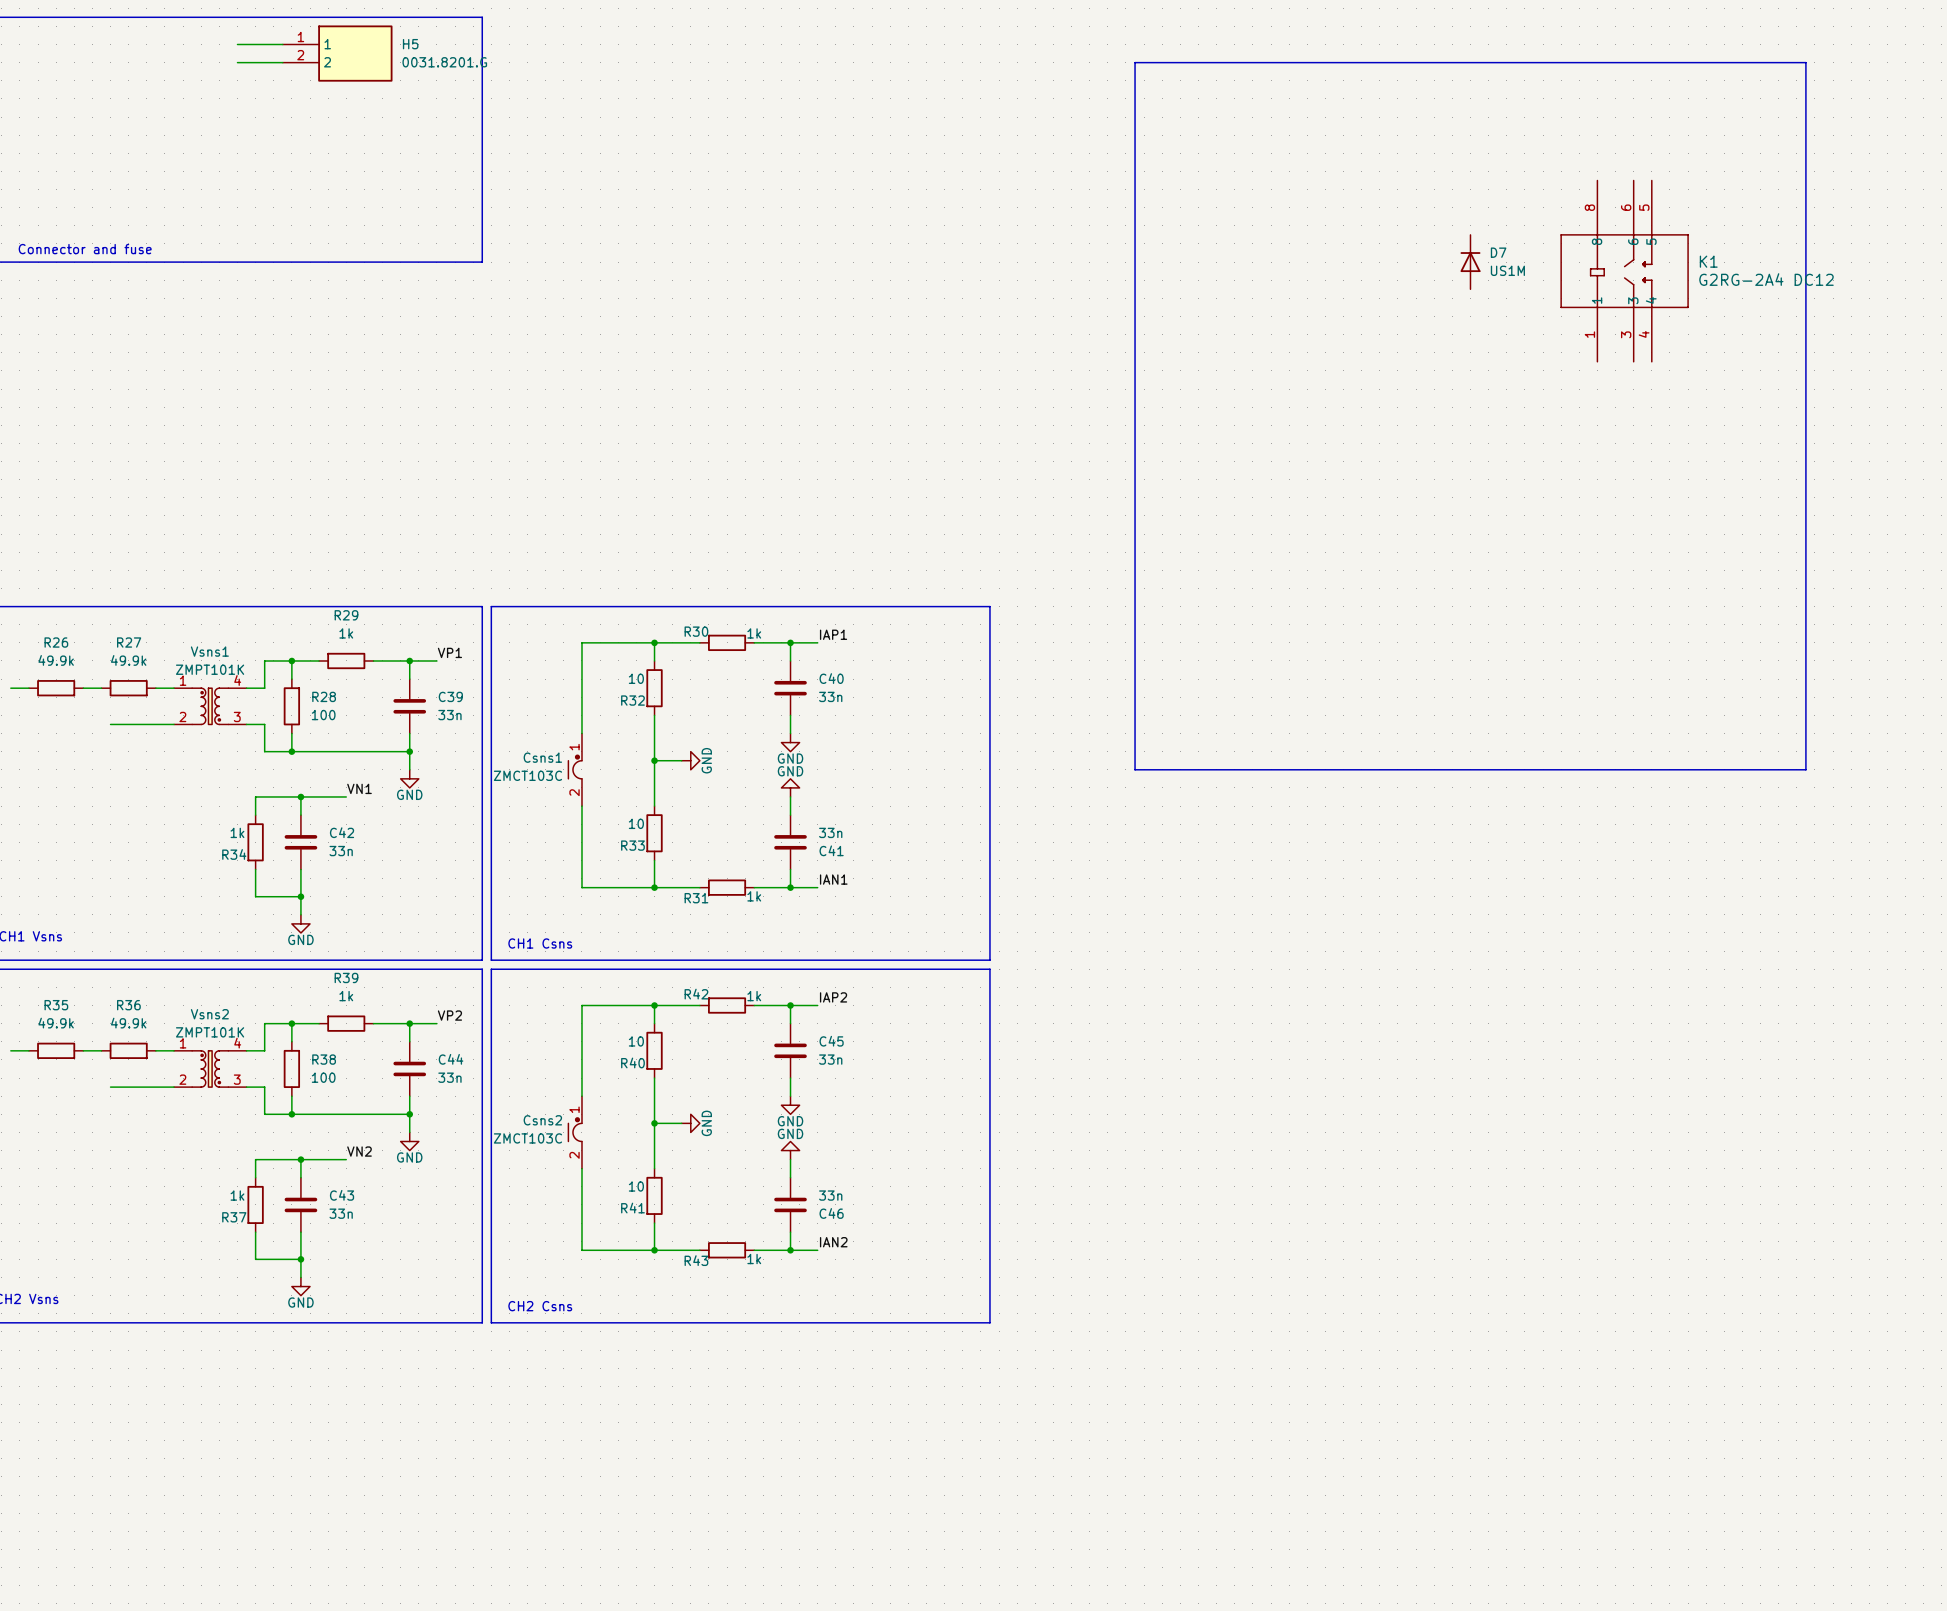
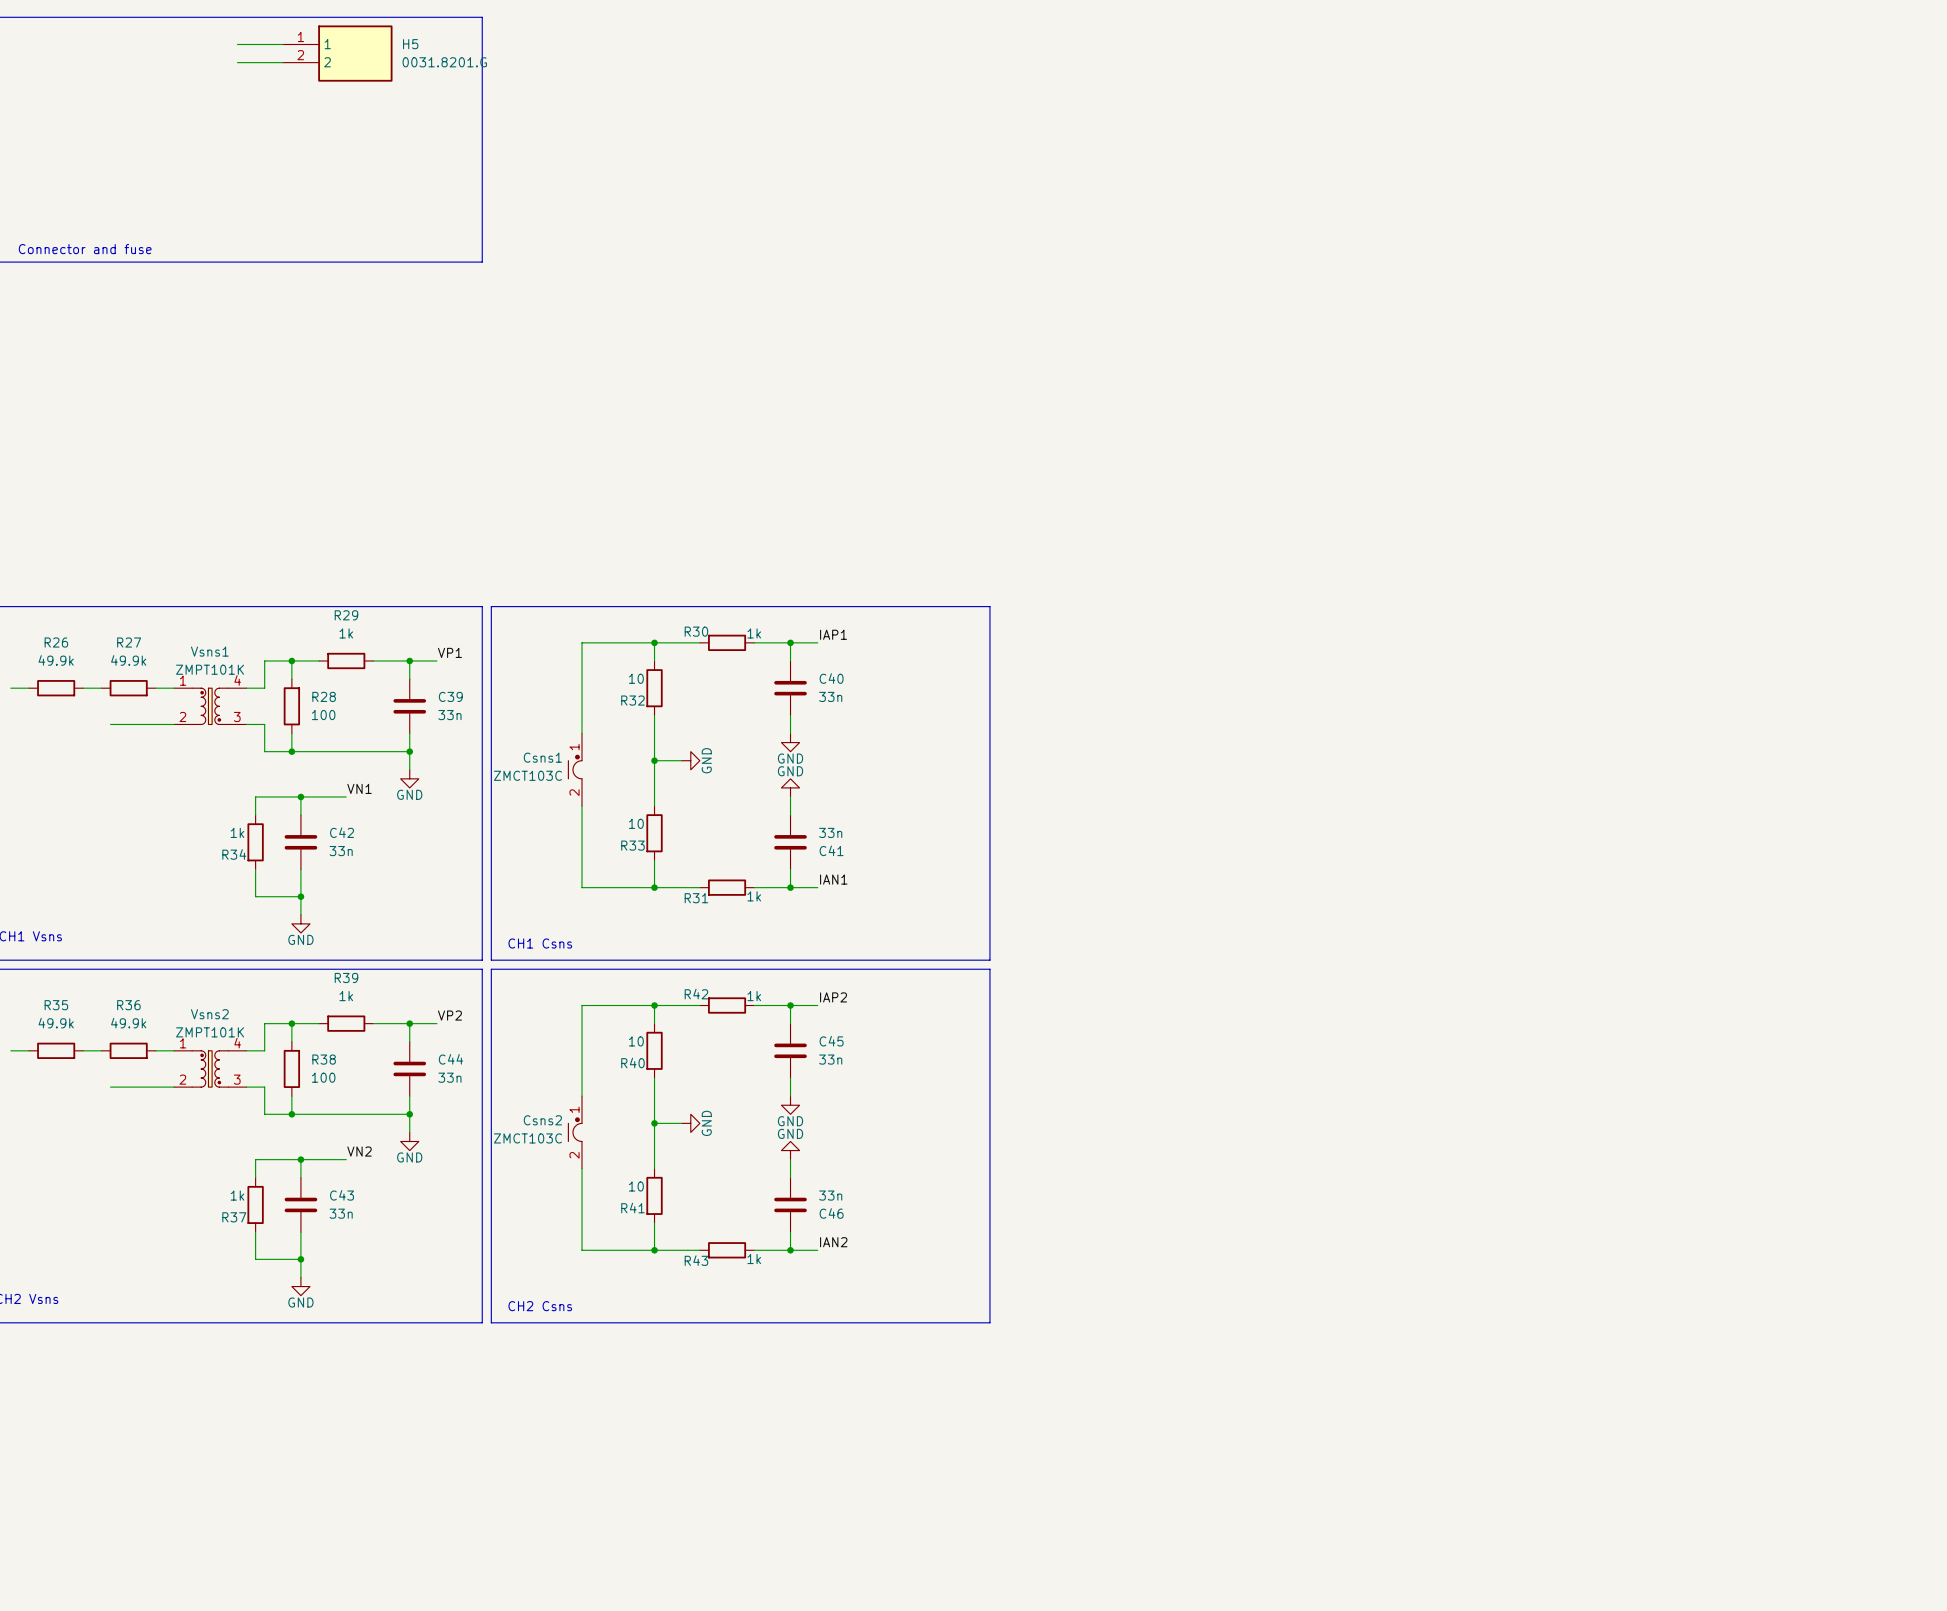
line: (1135, 62) (1805, 62) (1805, 769) (1135, 769) (1135, 62) -> none
D7: US1M (1470, 262) -> none
K1: G2RG-2A4 DC12 (1624, 271) -> none

